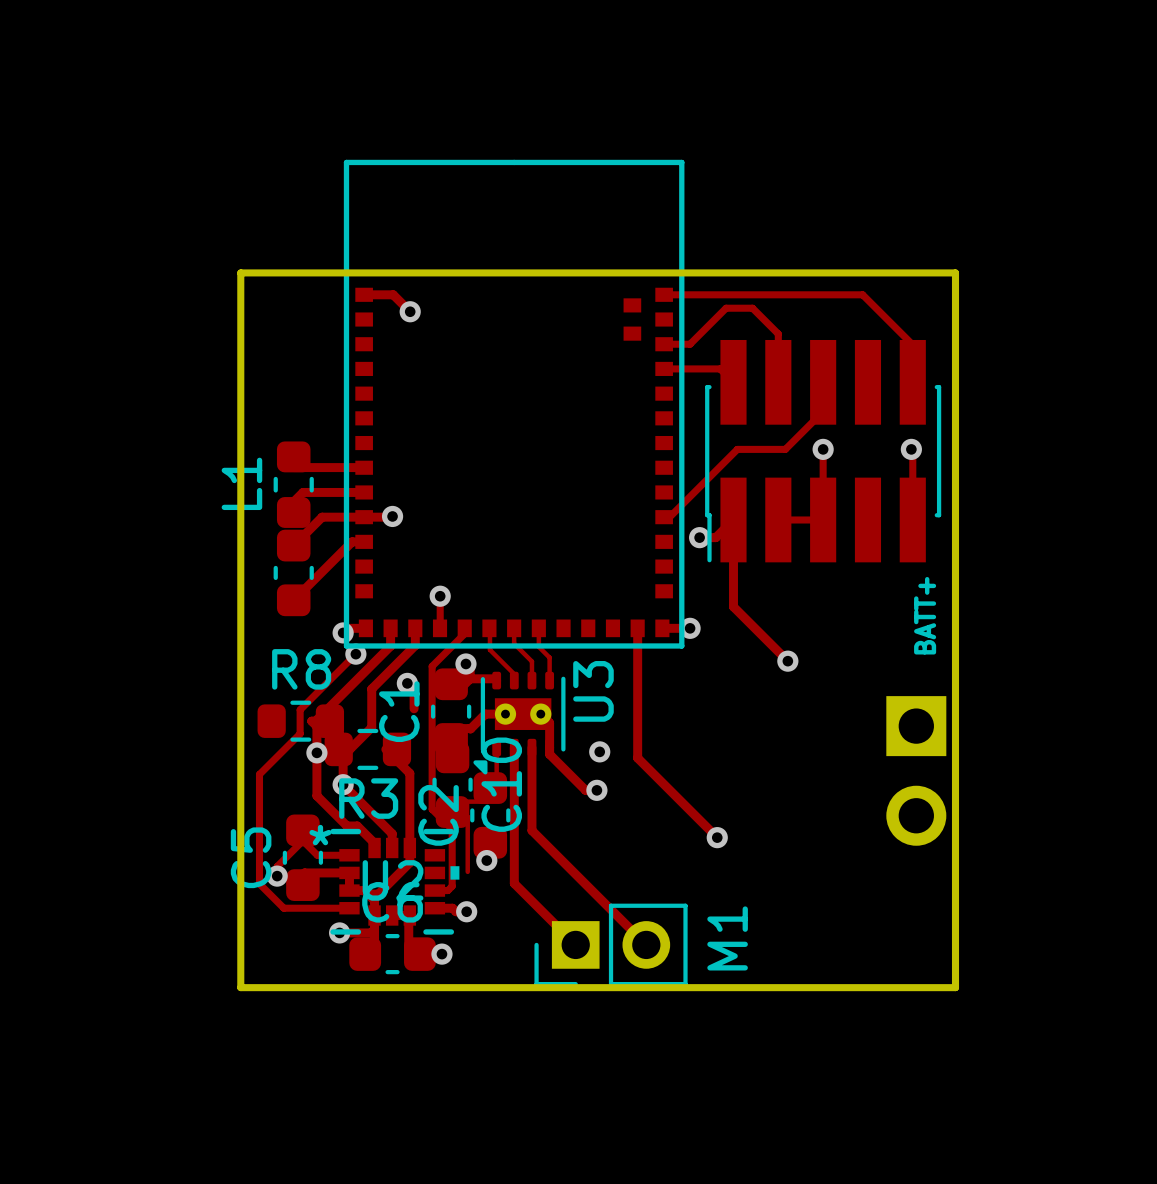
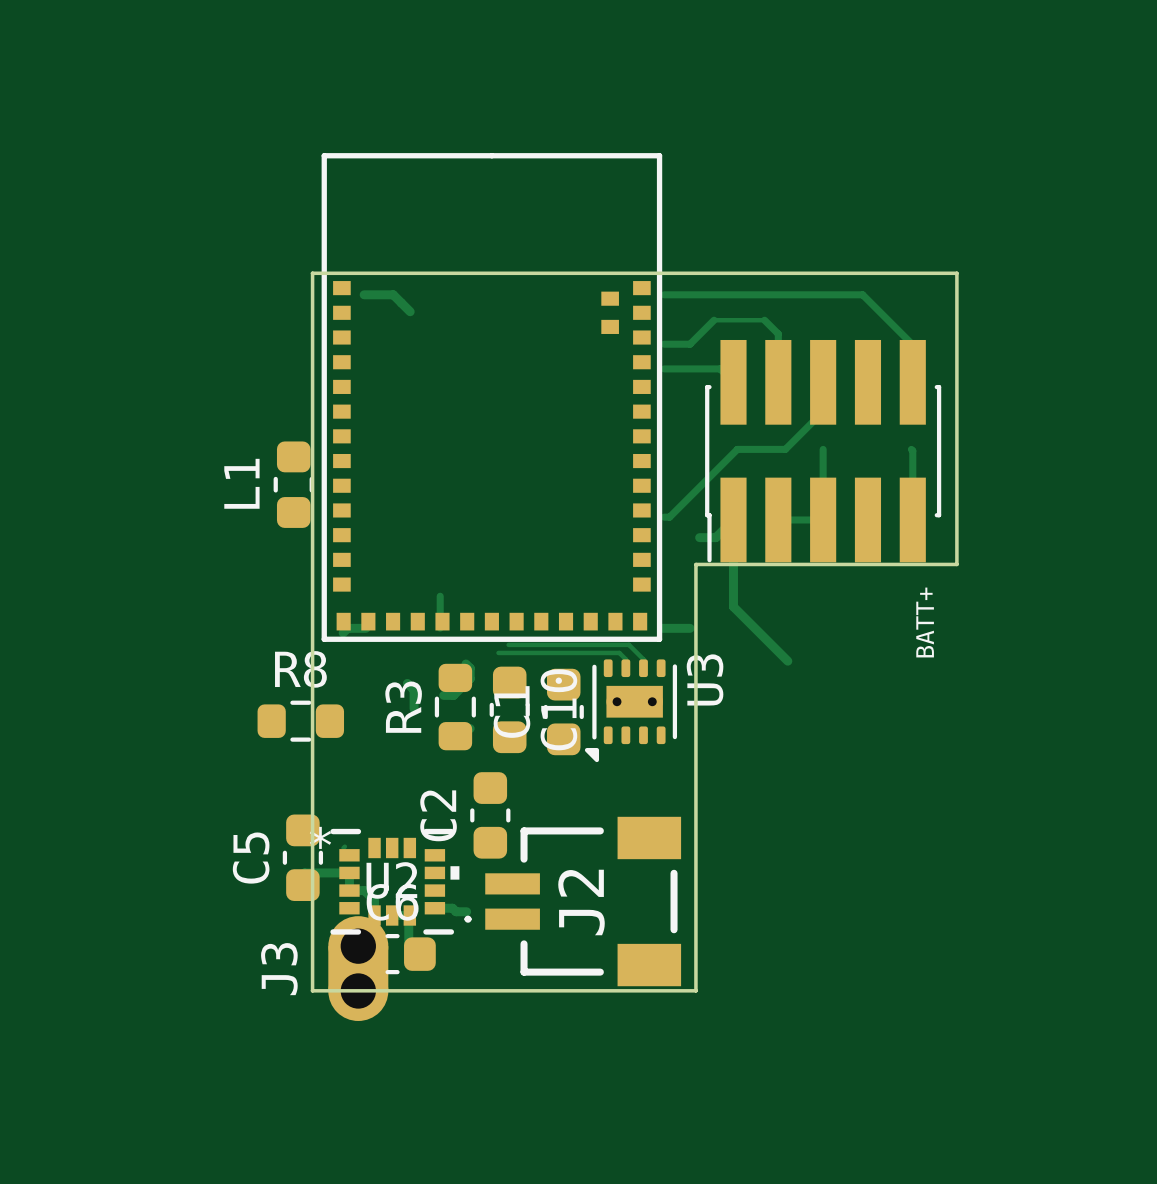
board edge: (240, 272) (955, 272) (955, 987) (240, 987) (240, 272) -> (312, 273) (956, 273) (956, 564) (696, 564) (695, 990) (312, 990) (312, 273)
via: (410, 311) -> none
track: (714, 320) (726, 308) (752, 308) (764, 320) -> (714, 320) (764, 320)
part position: (514, 404) -> (491, 397)
via: (823, 449) -> none
via: (911, 449) -> none
track: (293, 467) (363, 467) -> none
track: (364, 492) (303, 492) (293, 501) -> none
track: (392, 516) (322, 517) (293, 545) -> none
via: (392, 516) -> none
via: (699, 537) -> none
track: (364, 541) (352, 541) (293, 600) -> none
part: (293, 572) -> none
via: (440, 596) -> none
track: (390, 628) (390, 646) (315, 721) (311, 721) (316, 726) (316, 795) (347, 825) (357, 825) (375, 844) -> none
track: (415, 628) (415, 645) (371, 689) (371, 727) (343, 756) (343, 784) (392, 833) (392, 848) -> none
track: (464, 628) (464, 633) (432, 666) (432, 809) (452, 829) (452, 886) (447, 890) (434, 890) -> none
track: (489, 628) (489, 649) (514, 674) (514, 680) -> none
track: (514, 628) (514, 643) (531, 661) (531, 680) -> none
track: (538, 628) (538, 646) (549, 657) (549, 680) -> none
track: (637, 628) (637, 758) (717, 837) -> none
via: (690, 628) -> none
via: (343, 632) -> none
track: none -> (508, 644) (628, 644) (643, 659) (643, 668)
track: none -> (498, 652) (619, 652) (625, 659) (625, 668)
track: (355, 654) (300, 709) (300, 733) (259, 774) (259, 883) (283, 908) (349, 908) -> none
via: (355, 654) -> none
via: (787, 661) -> none
via: (465, 663) -> none
track: (470, 678) (494, 678) (496, 680) -> none
via: (407, 683) -> none
C1 position: (451, 711) -> (563, 711)
track: (505, 714) (485, 714) (470, 728) -> none
track: (540, 714) (549, 722) (549, 754) (585, 790) (596, 790) -> none
U3 position: (519, 723) -> (630, 710)
track: (496, 747) (496, 792) (487, 801) (452, 801) (467, 816) (467, 871) -> none
track: (514, 747) (514, 883) (575, 944) -> none
track: (531, 747) (531, 830) (646, 944) -> none
R3 rotation: 0° (367, 749) -> 90° clockwise (455, 707)
R3 position: (367, 749) -> (455, 707)
track: (385, 749) (409, 773) (409, 862) (378, 894) (367, 894) -> none
via: (599, 751) -> none
via: (316, 752) -> none
part: (916, 770) -> none
via: (343, 784) -> none
C10 position: (452, 784) -> (509, 709)
via: (596, 790) -> none
via: (717, 837) -> none
track: none -> (344, 846) (343, 848)
track: (349, 855) (317, 855) (302, 840) (277, 866) (277, 876) -> none
via: (486, 860) -> none
via: (277, 876) -> none
J2: none -> (572, 901)
via: (466, 911) -> none
via: (339, 932) -> none
M1: (611, 944) -> none
via: (441, 954) -> none
J3: none -> (358, 968)

